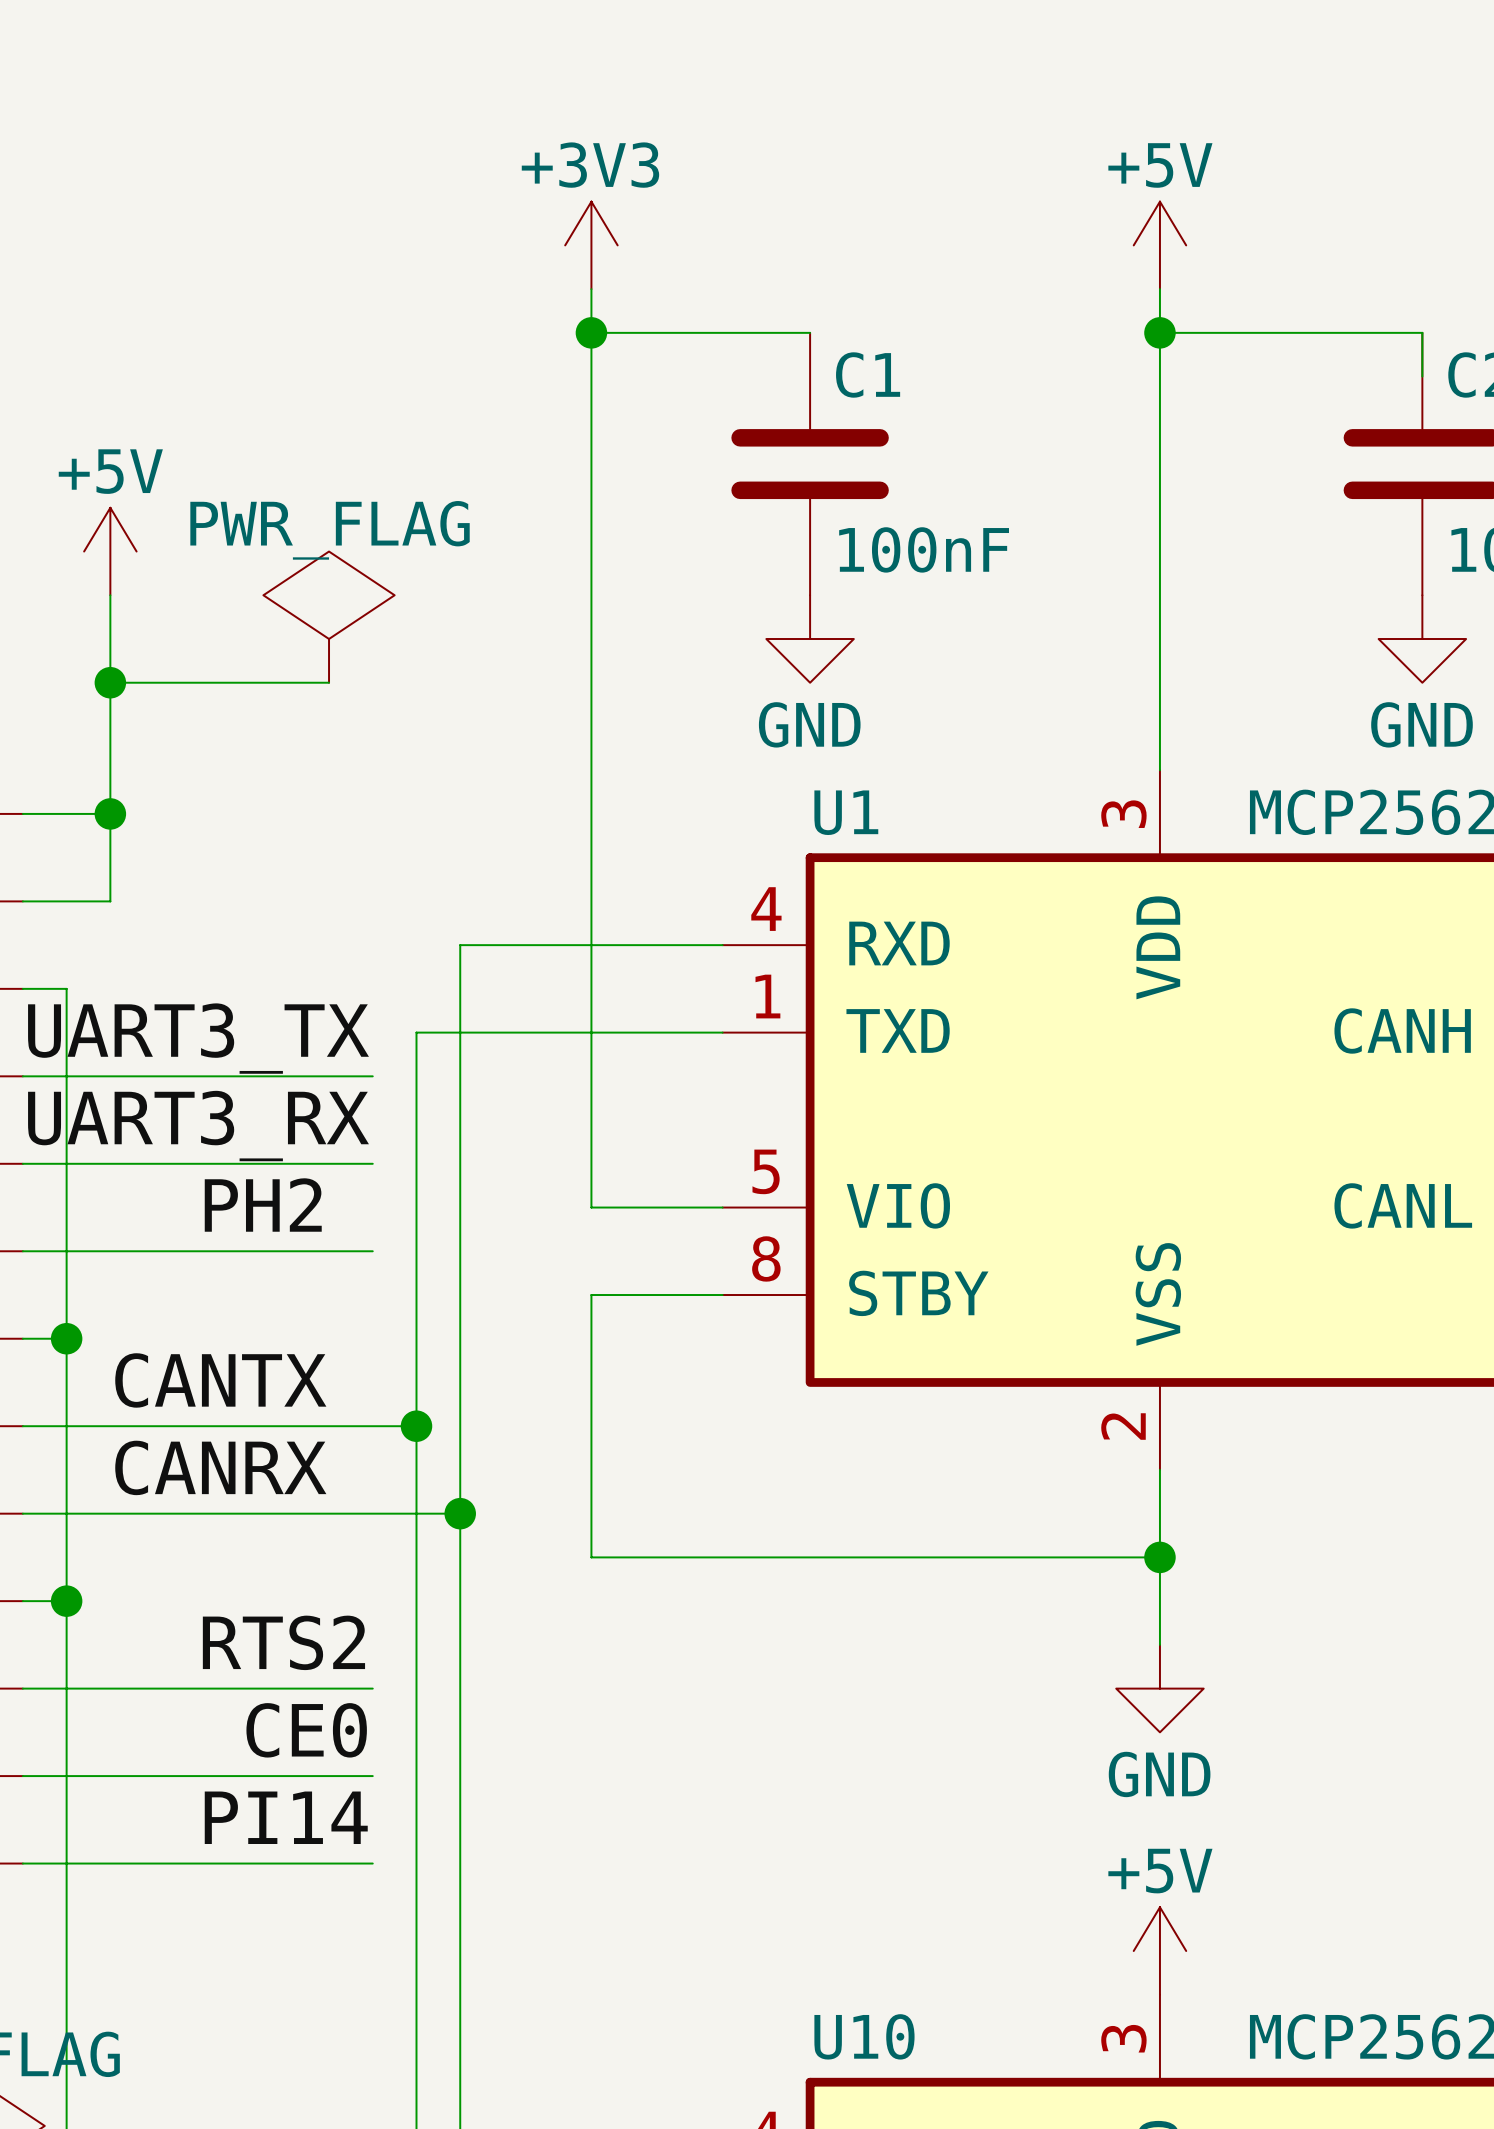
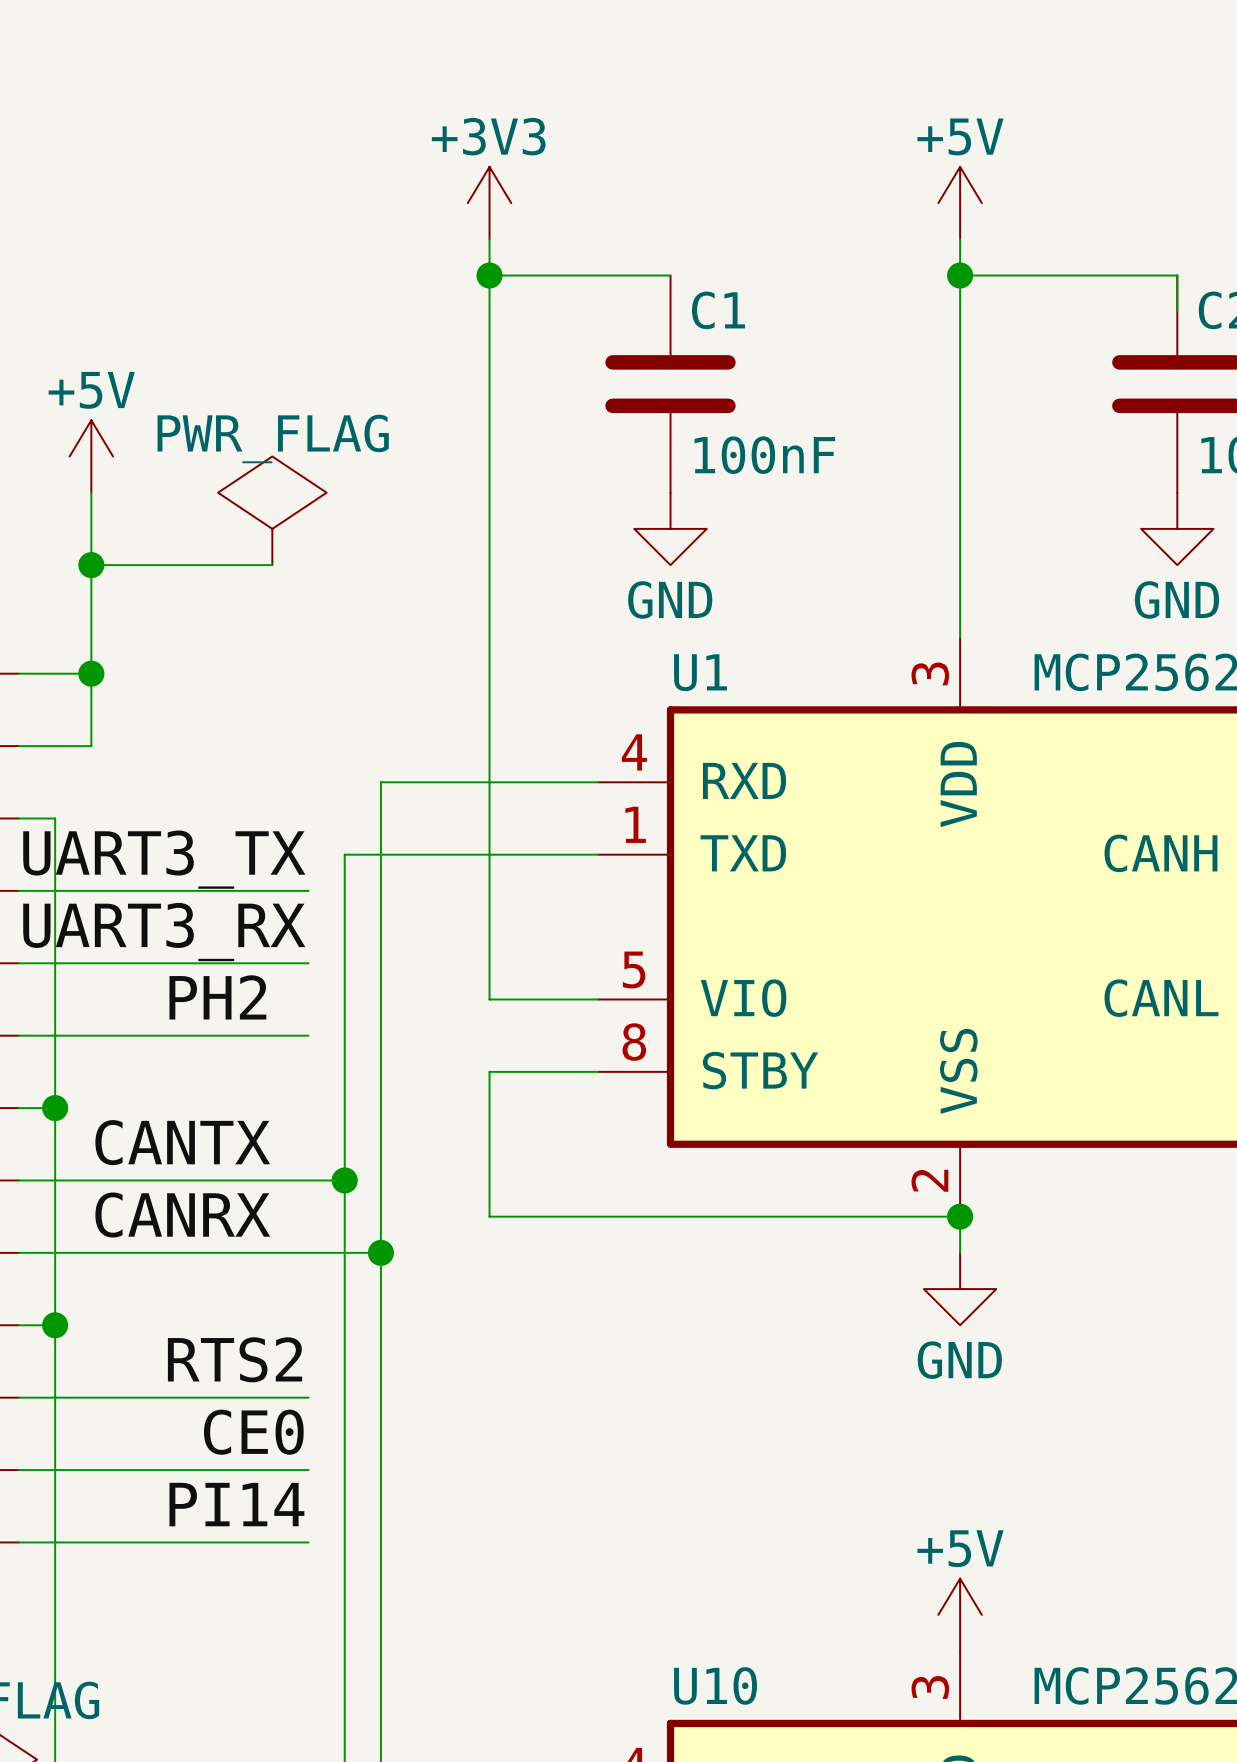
wire: (591, 1469) (591, 1557) (1159, 1557) -> (489, 1216) (960, 1216)
wire: (1159, 1513) (1159, 1644) -> none
junction position: (1159, 1557) -> (960, 1216)
power symbol position: GND (1159, 1688) -> GND (960, 1289)

